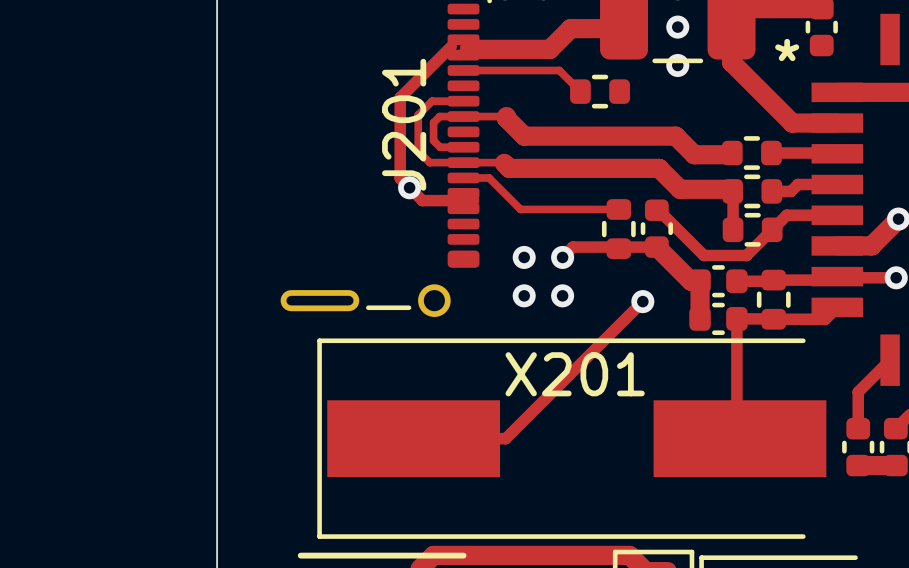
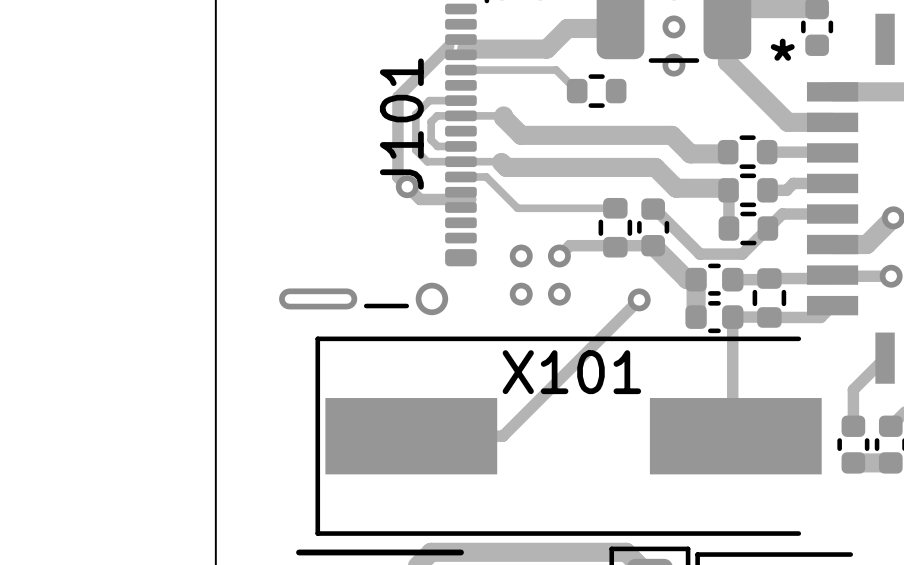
J201 name: J201 (404, 124) -> J101 (401, 124)
X201 name: X201 (575, 374) -> X101 (571, 372)

